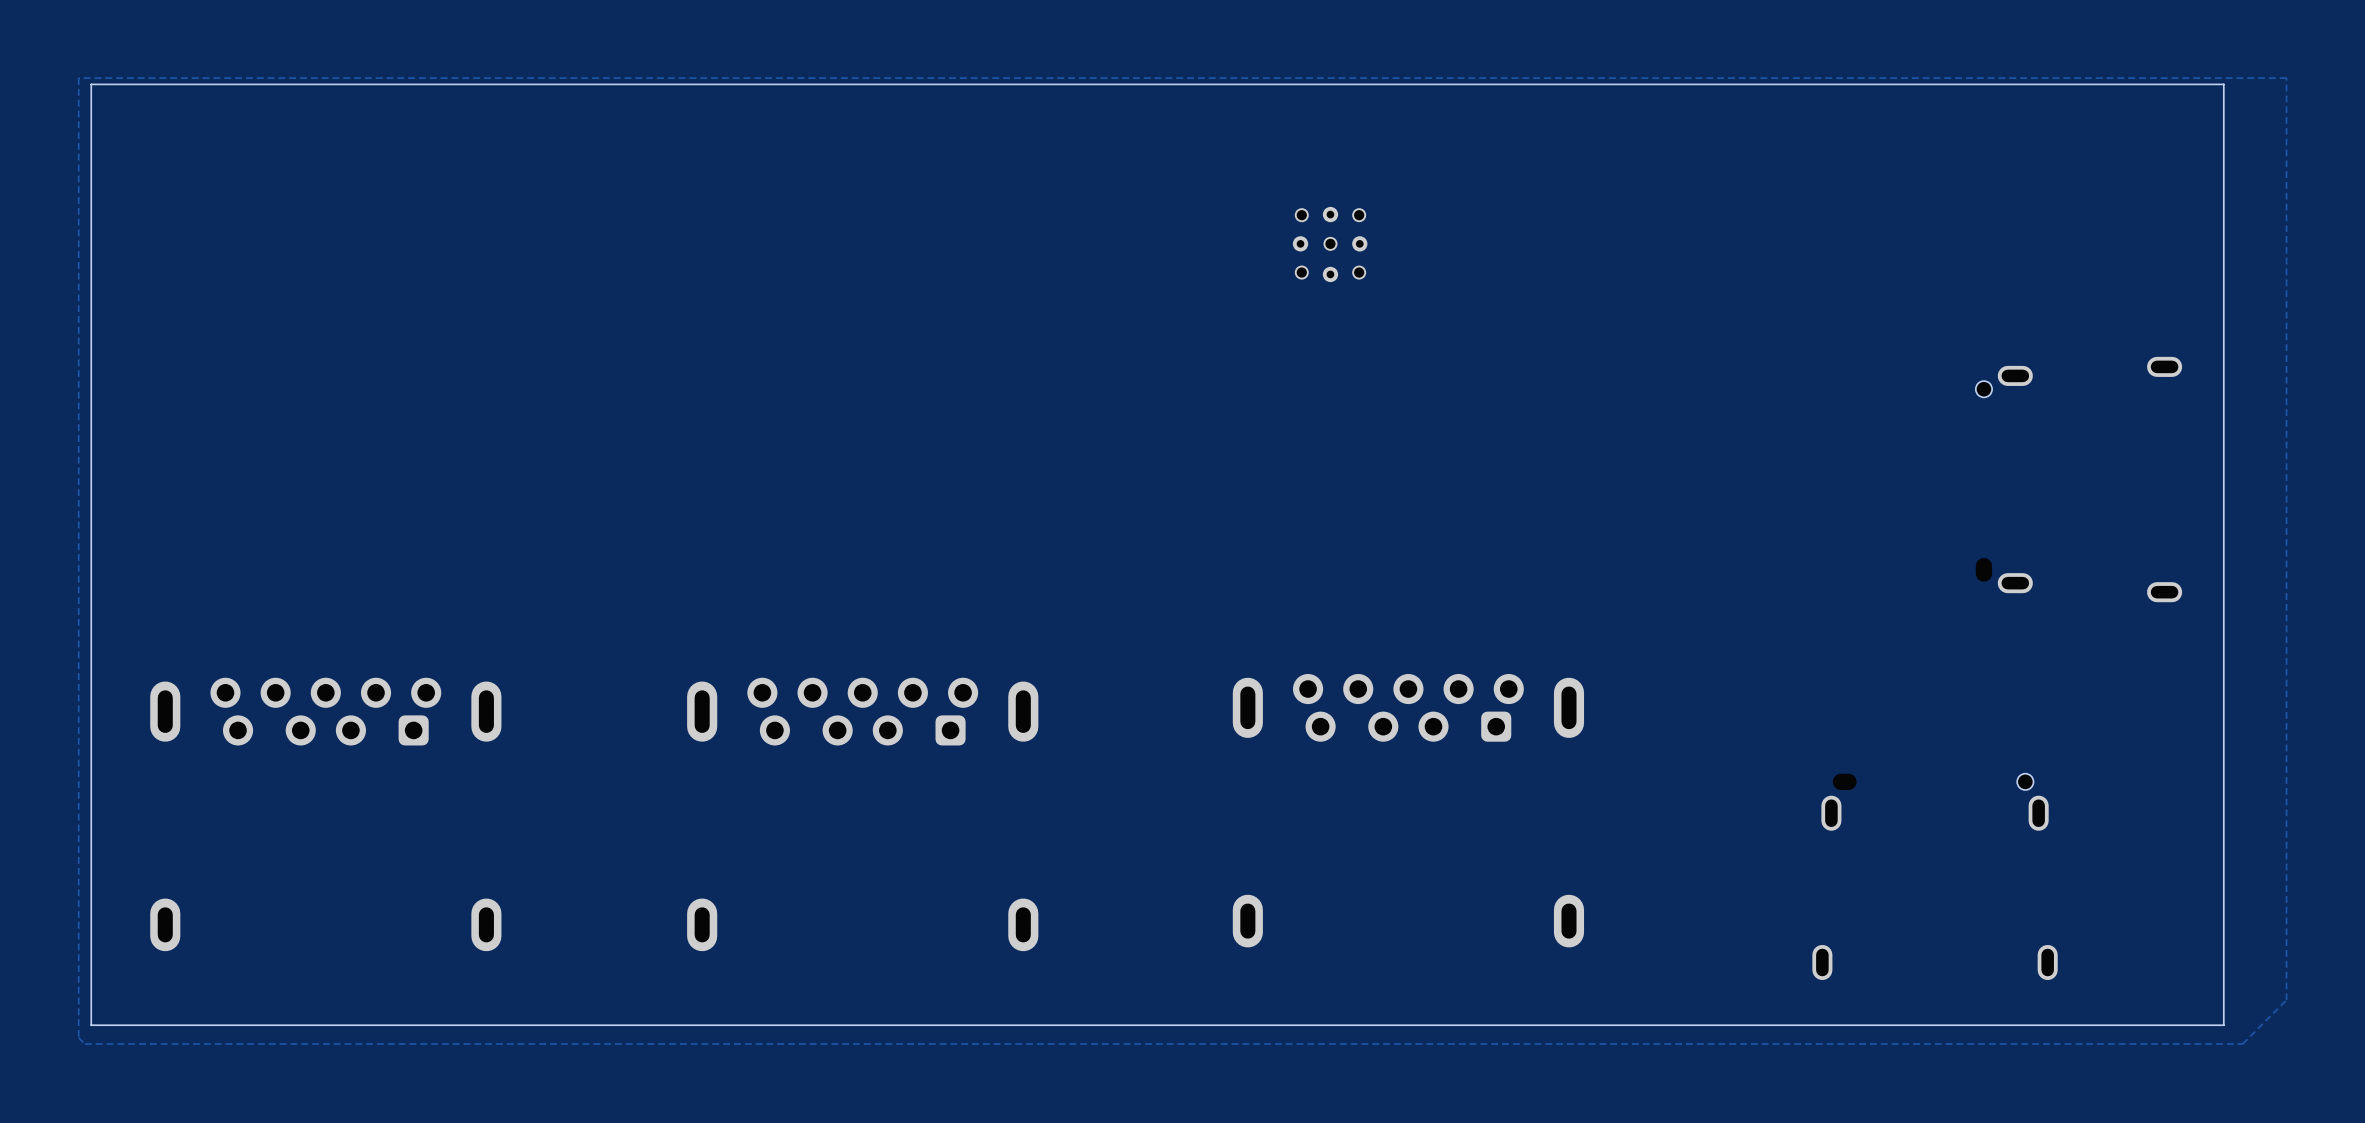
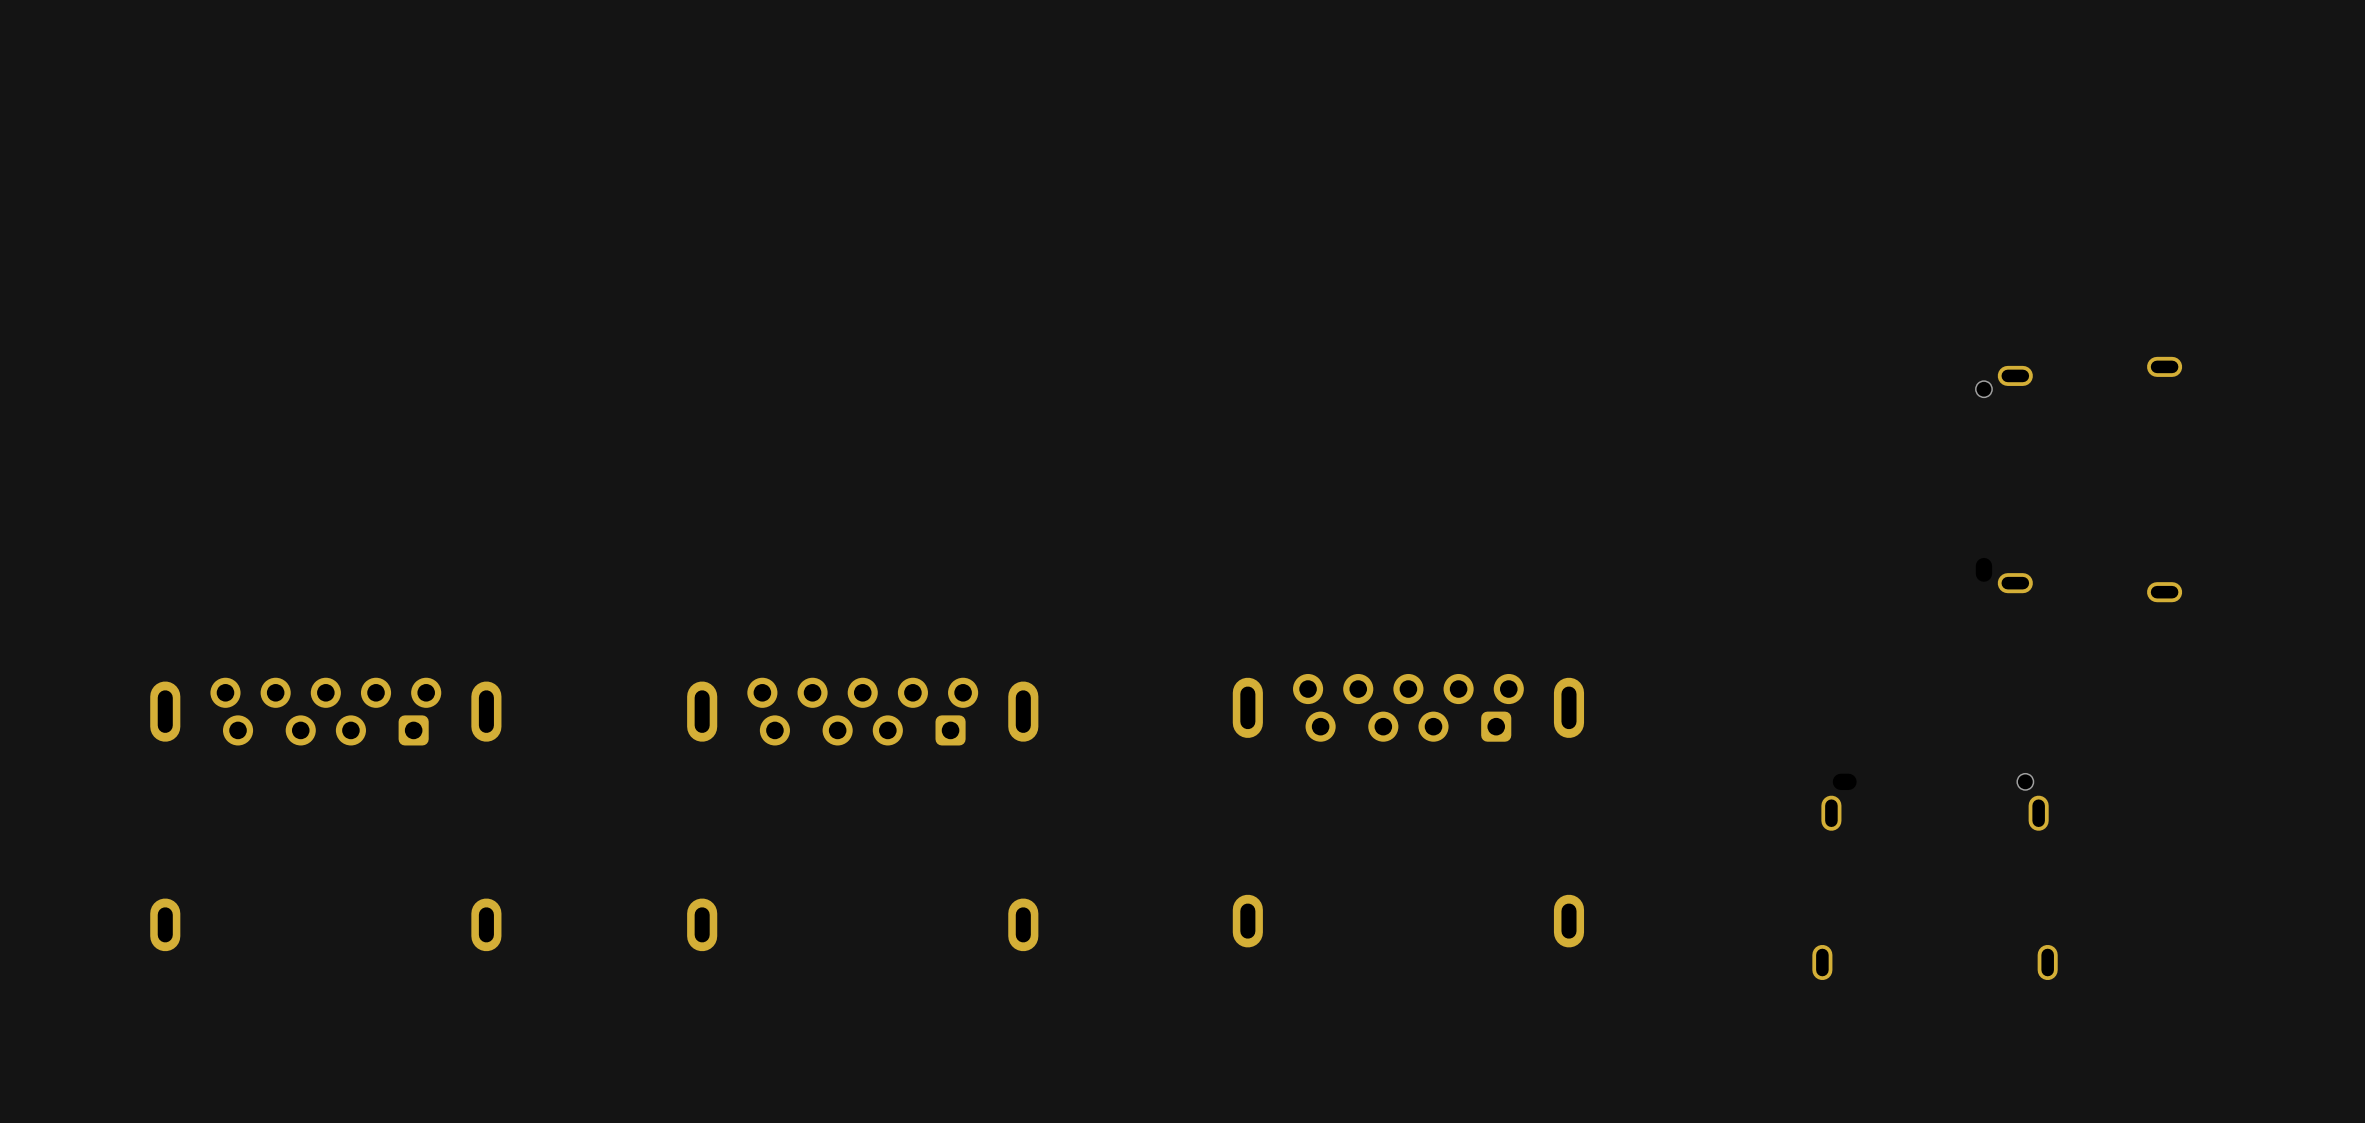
zone outline: (2286, 78) (78, 78) (78, 1037) (84, 1044) (2242, 1044) (2286, 1000) (2286, 78) -> none
board edge: (2223, 84) (91, 84) (91, 1025) (2223, 1025) (2223, 84) -> none
part: (1330, 244) -> none

